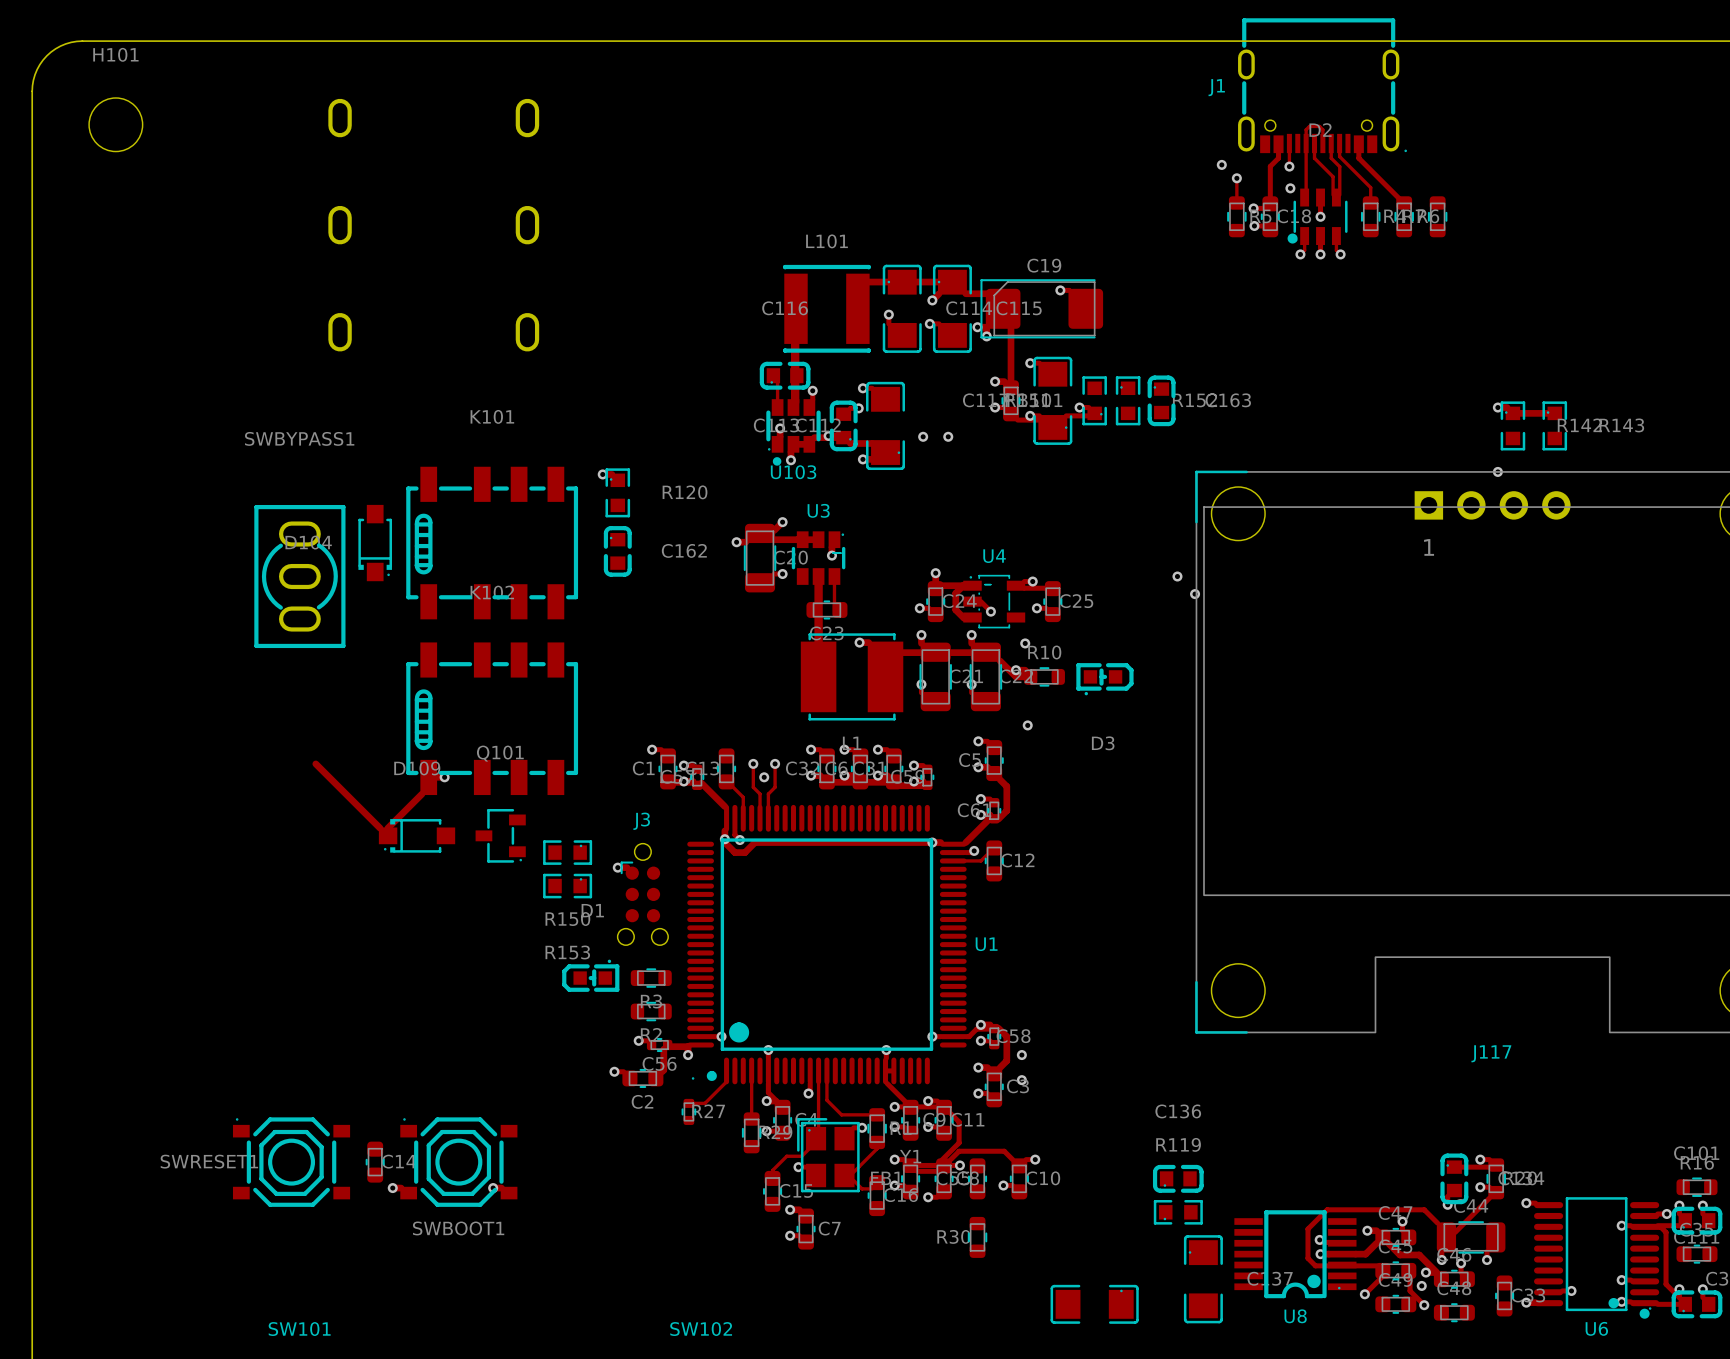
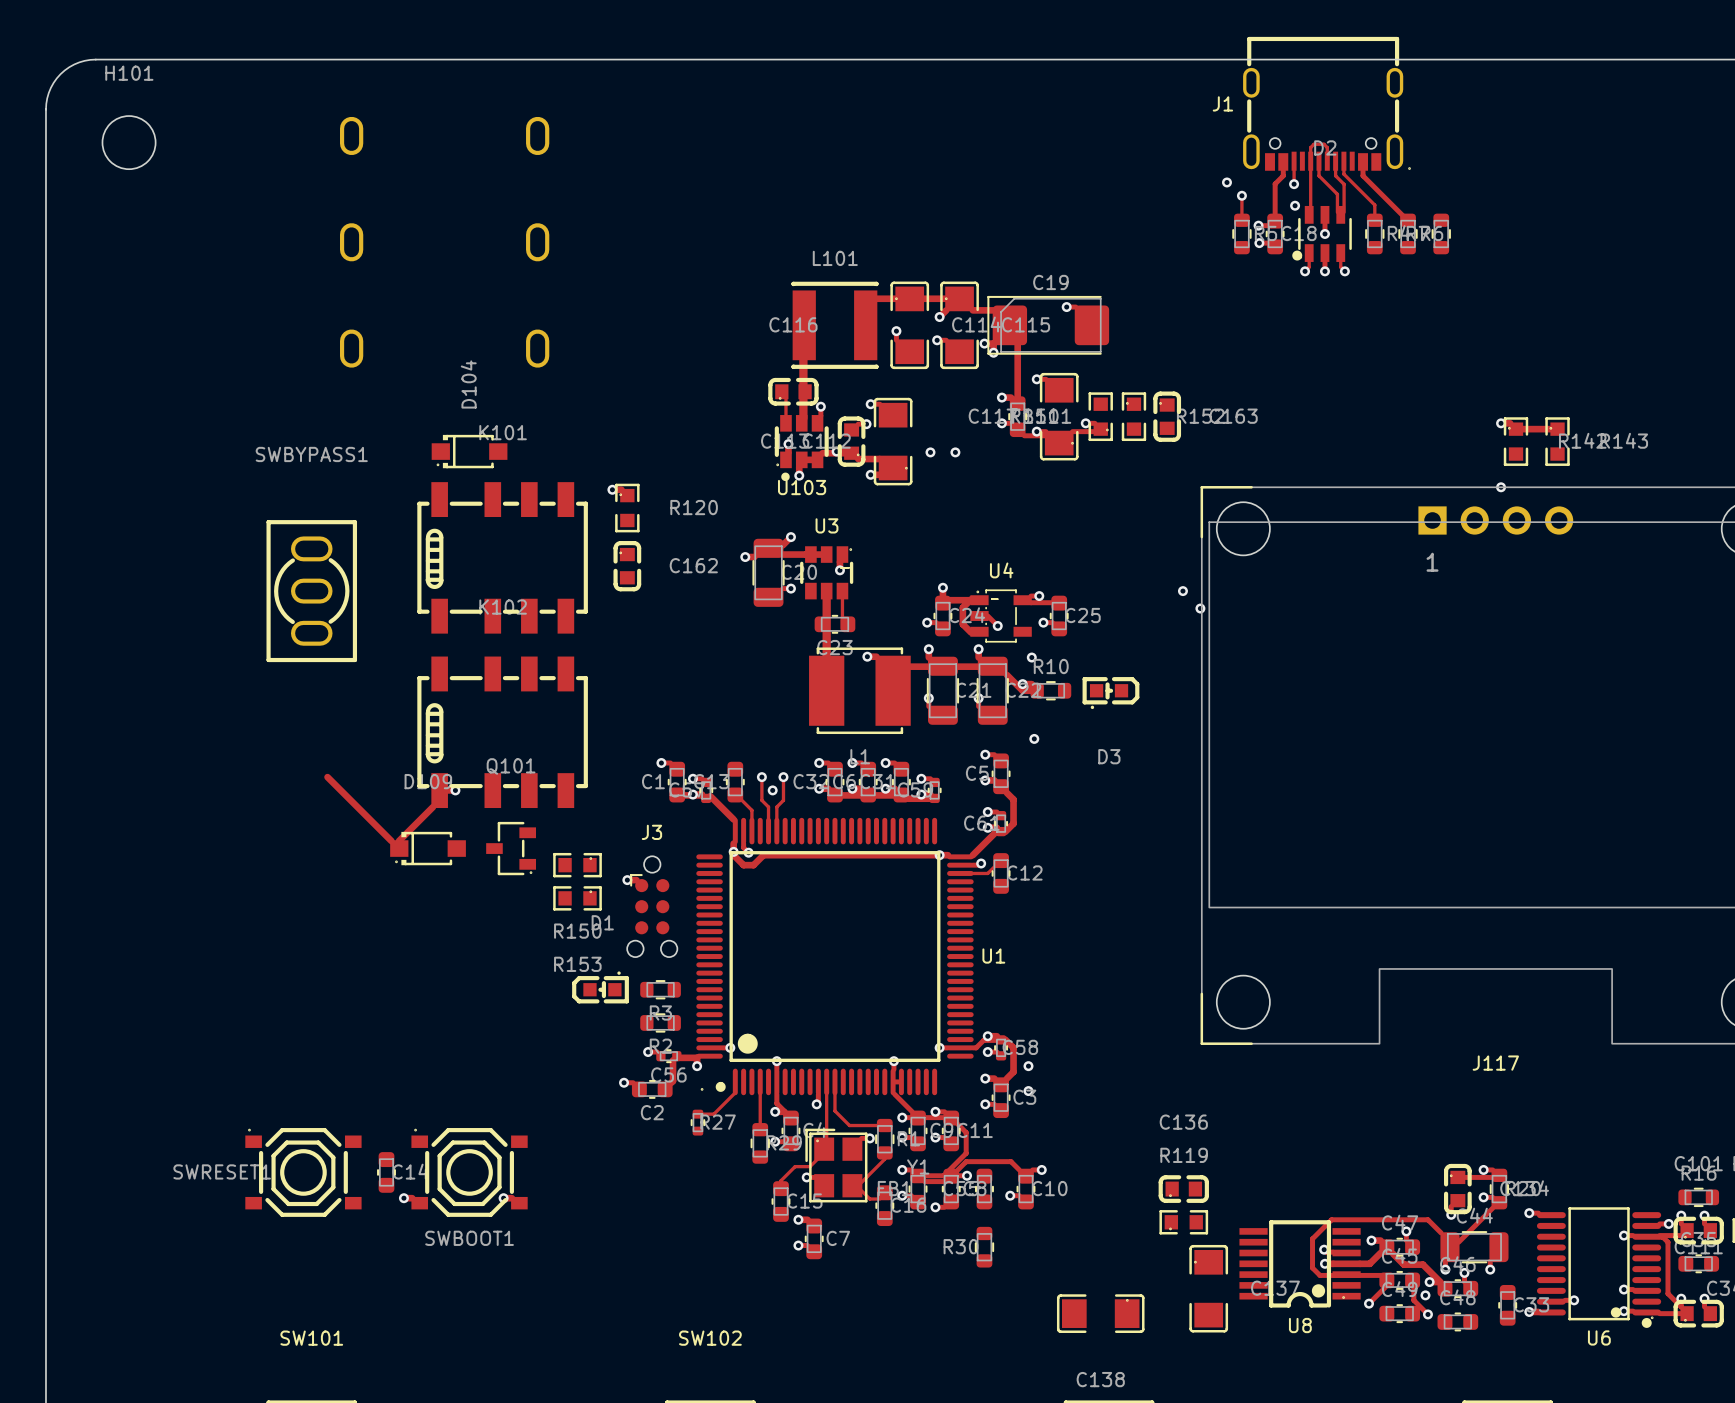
D104 rotation: 0° (375, 543) -> 90° clockwise (469, 451)
D104 position: (375, 543) -> (469, 451)

